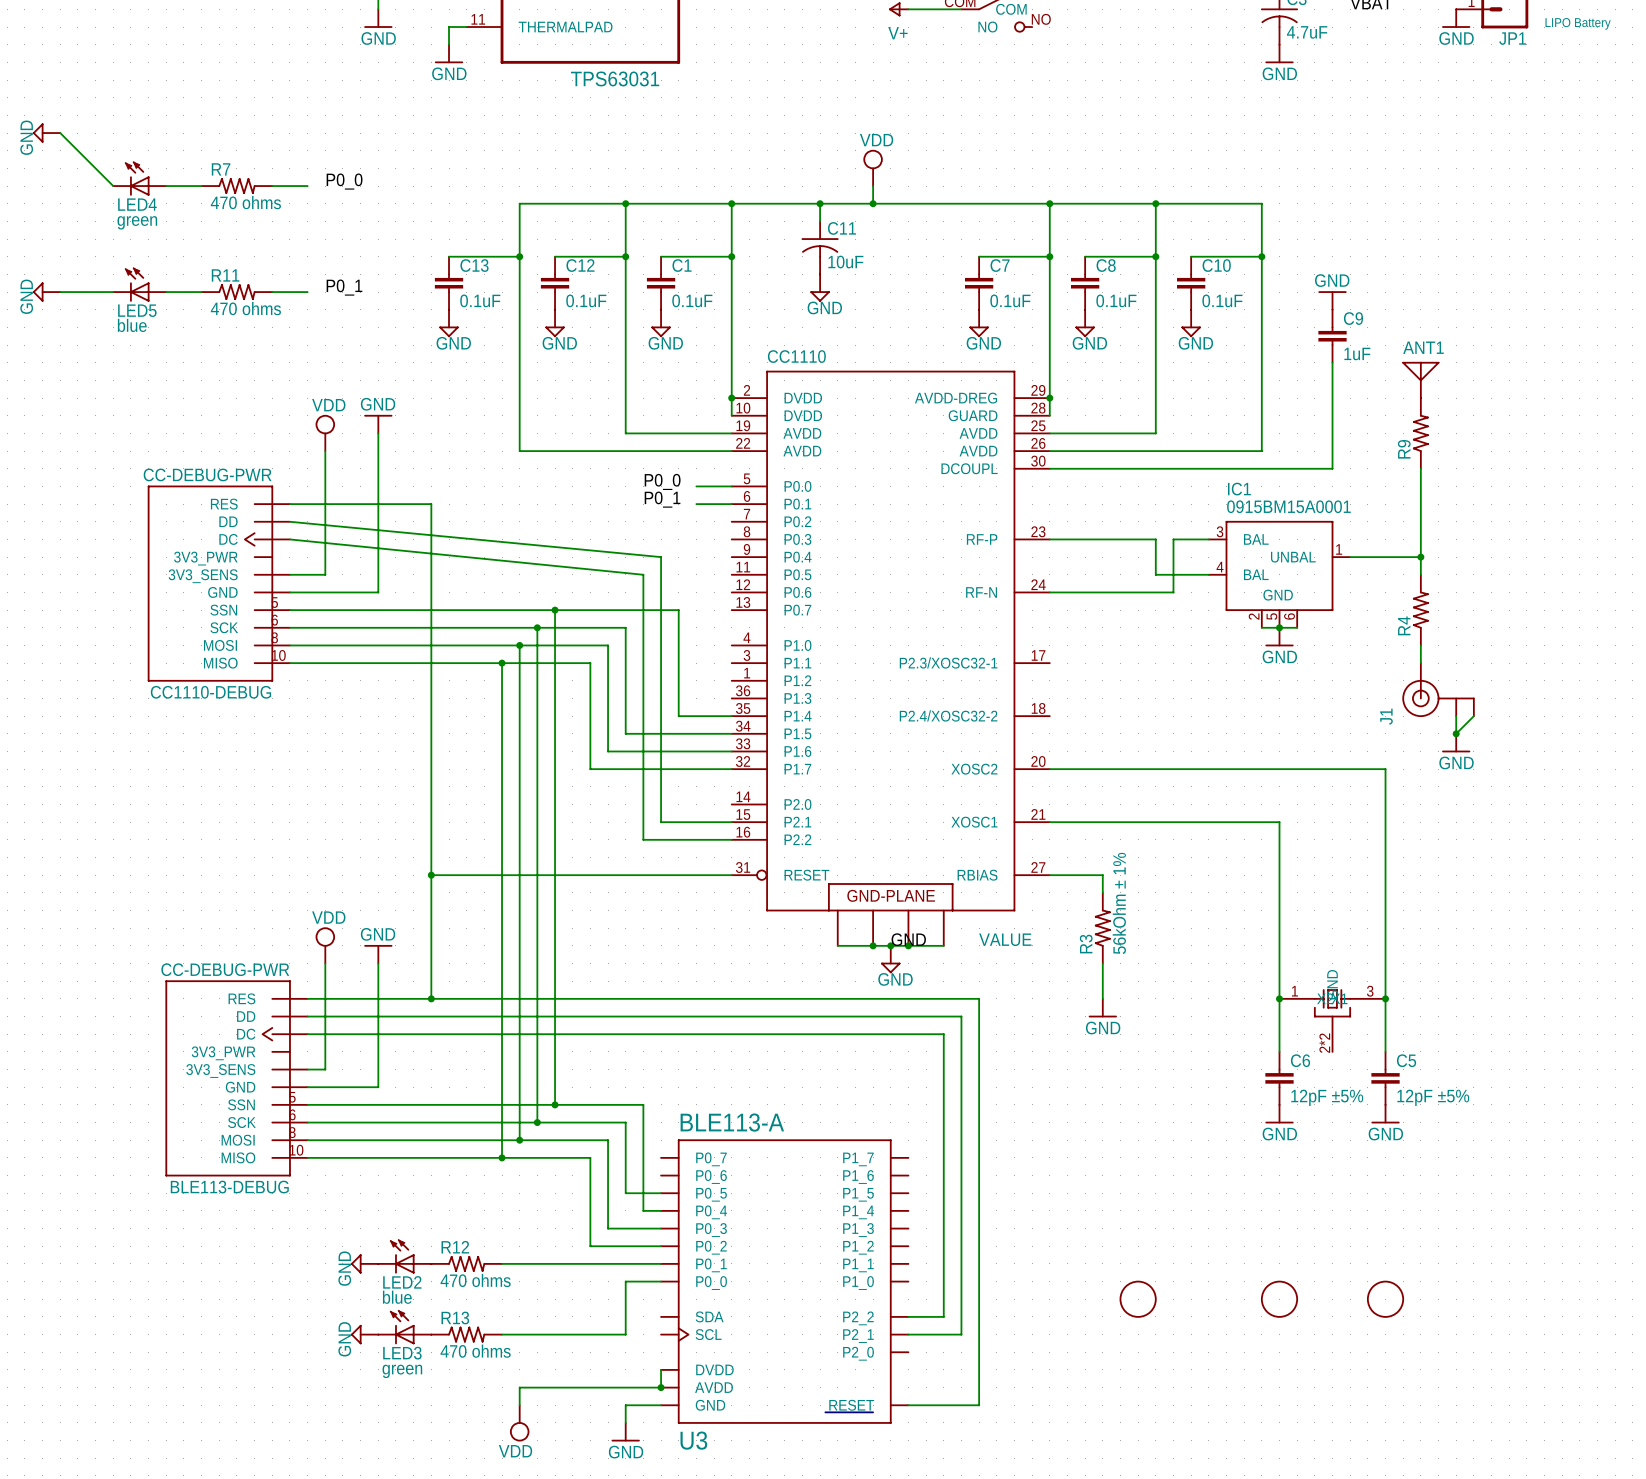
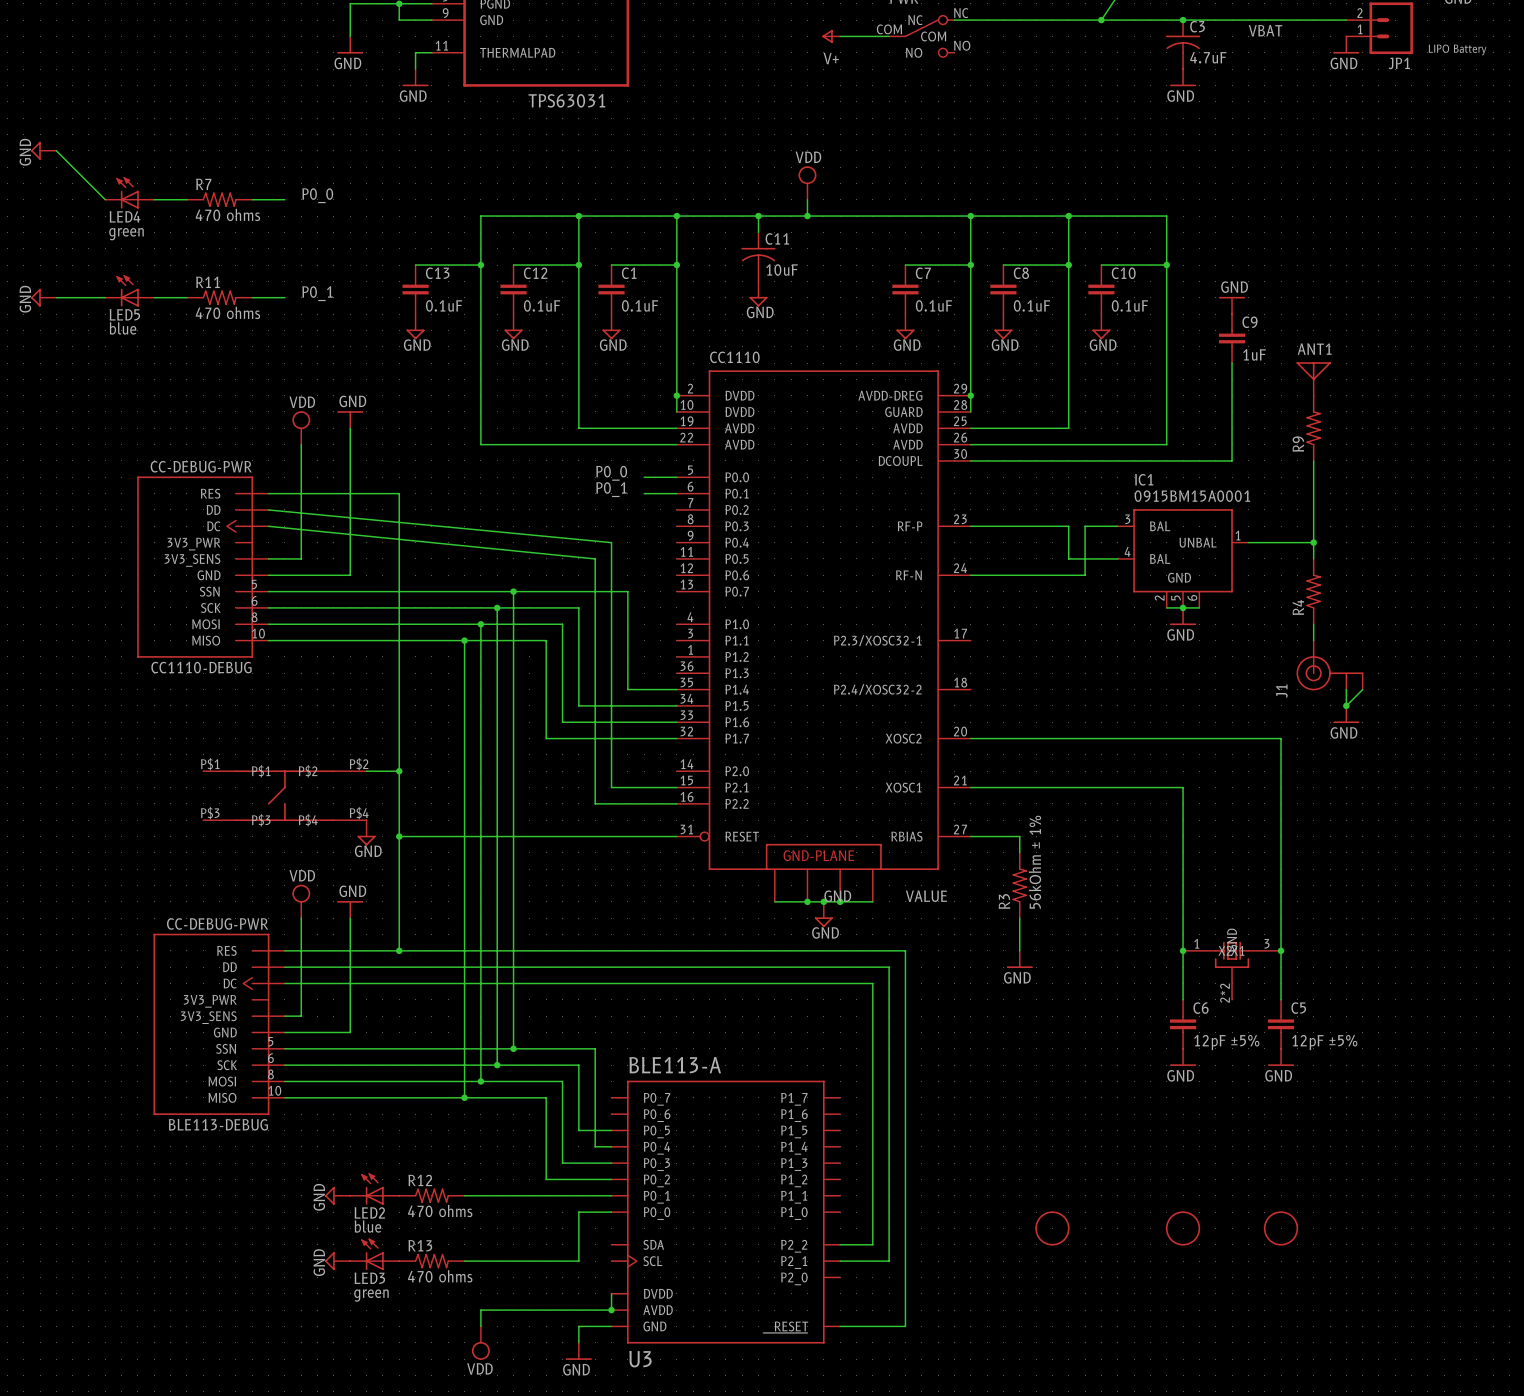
wire: none -> (366, 771) (399, 771)
junction: none -> (399, 771)
part: none -> (284, 795)
power symbol: none -> GND (366, 832)

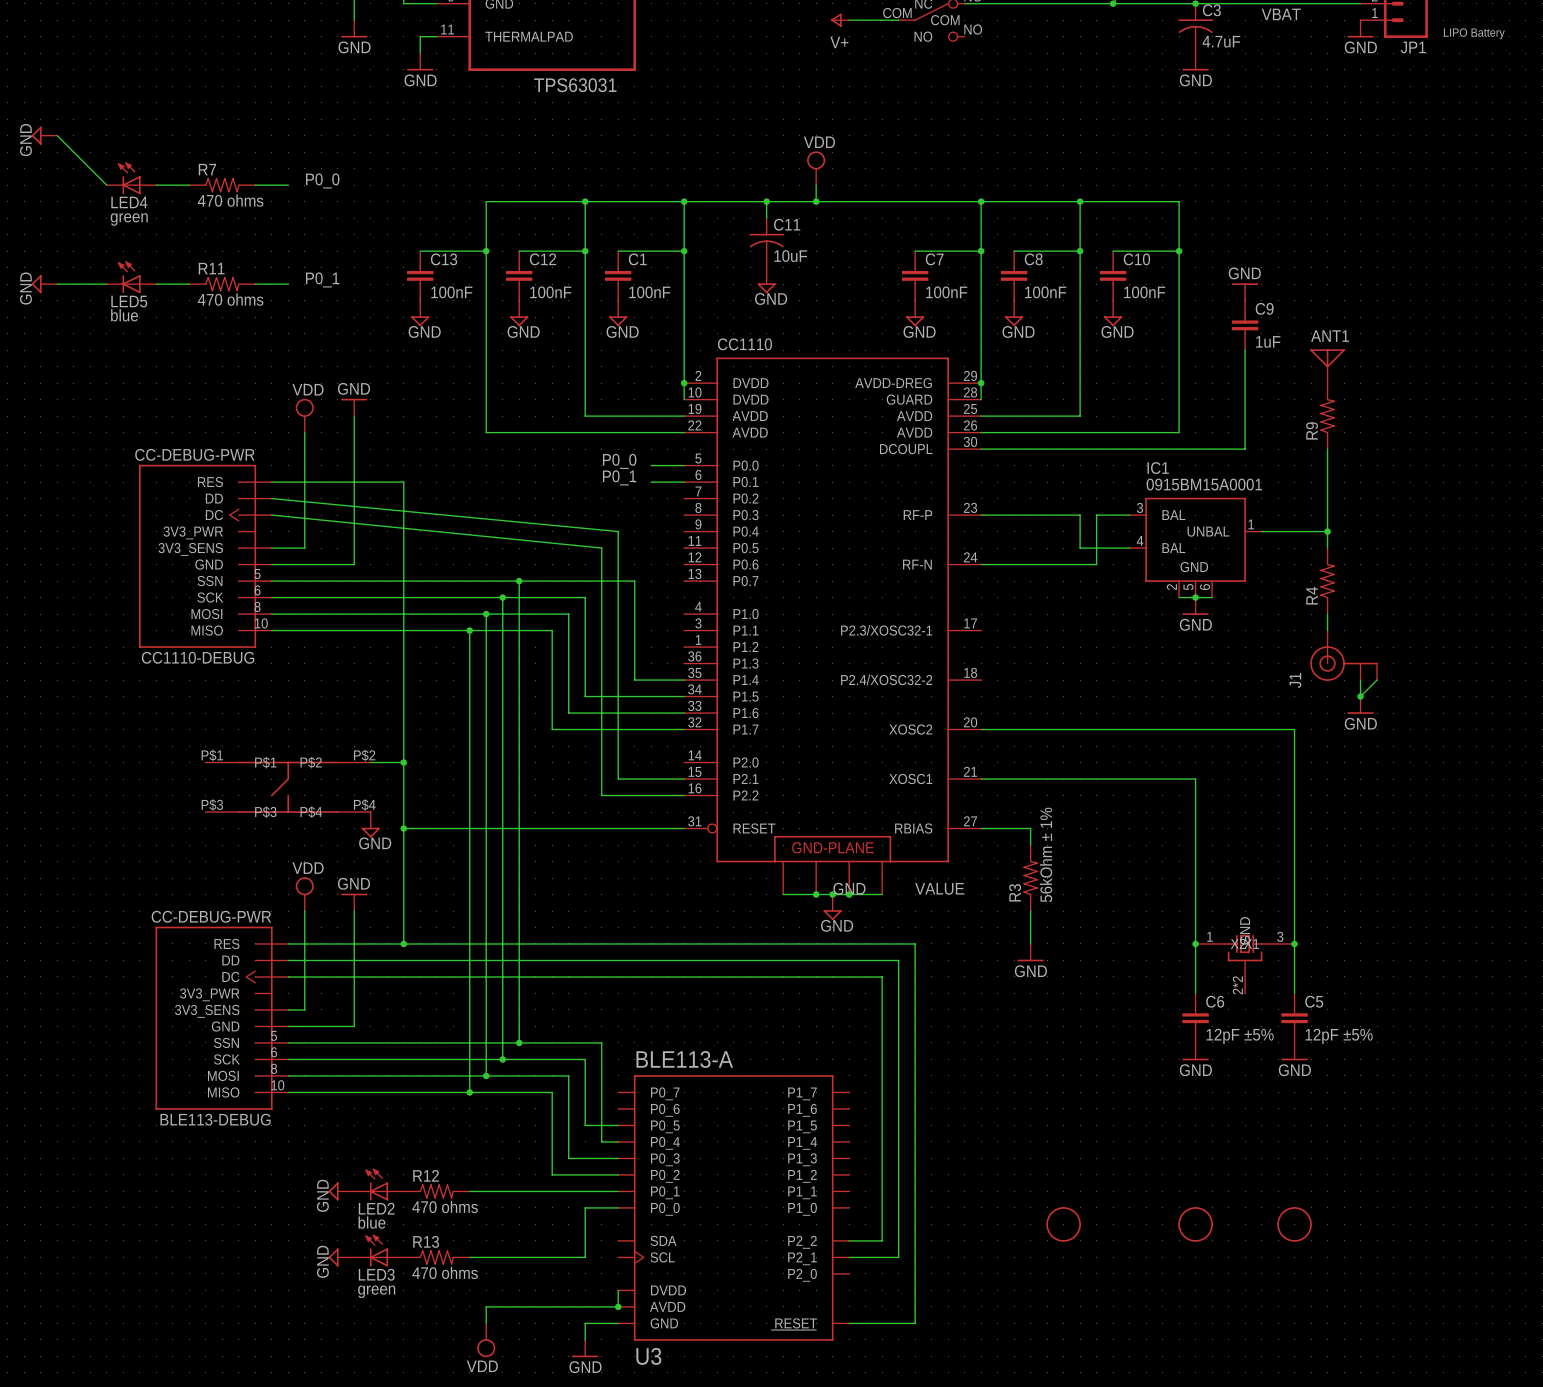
C13 value: 0.1uF (444, 305) -> 100nF (451, 292)
C12 value: 0.1uF (542, 305) -> 100nF (550, 292)
C1 value: 0.1uF (640, 305) -> 100nF (649, 292)
C7 value: 0.1uF (933, 305) -> 100nF (946, 292)
C8 value: 0.1uF (1031, 305) -> 100nF (1045, 292)
C10 value: 0.1uF (1129, 305) -> 100nF (1144, 292)

